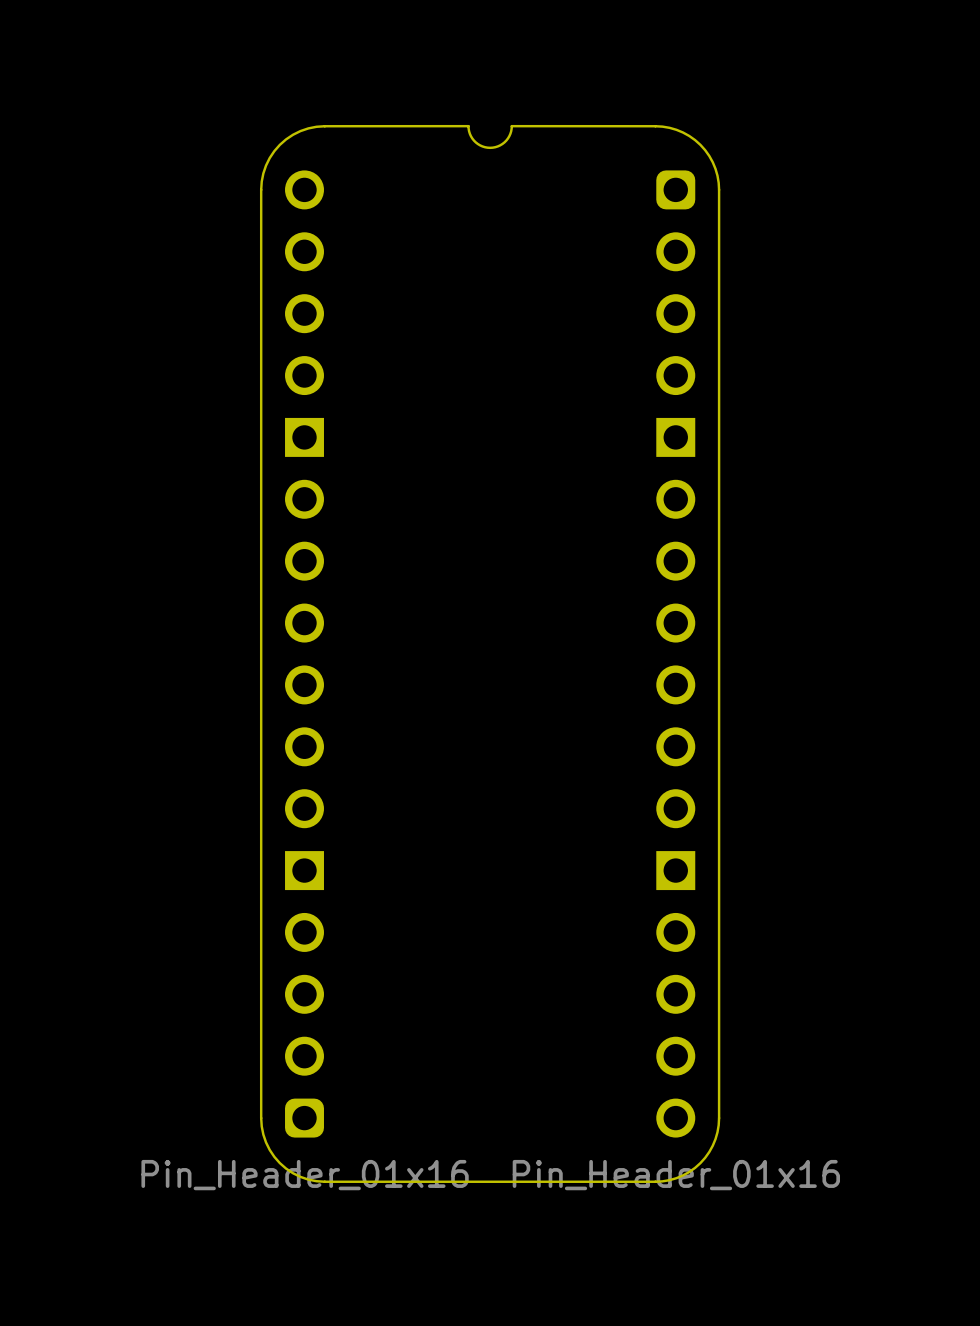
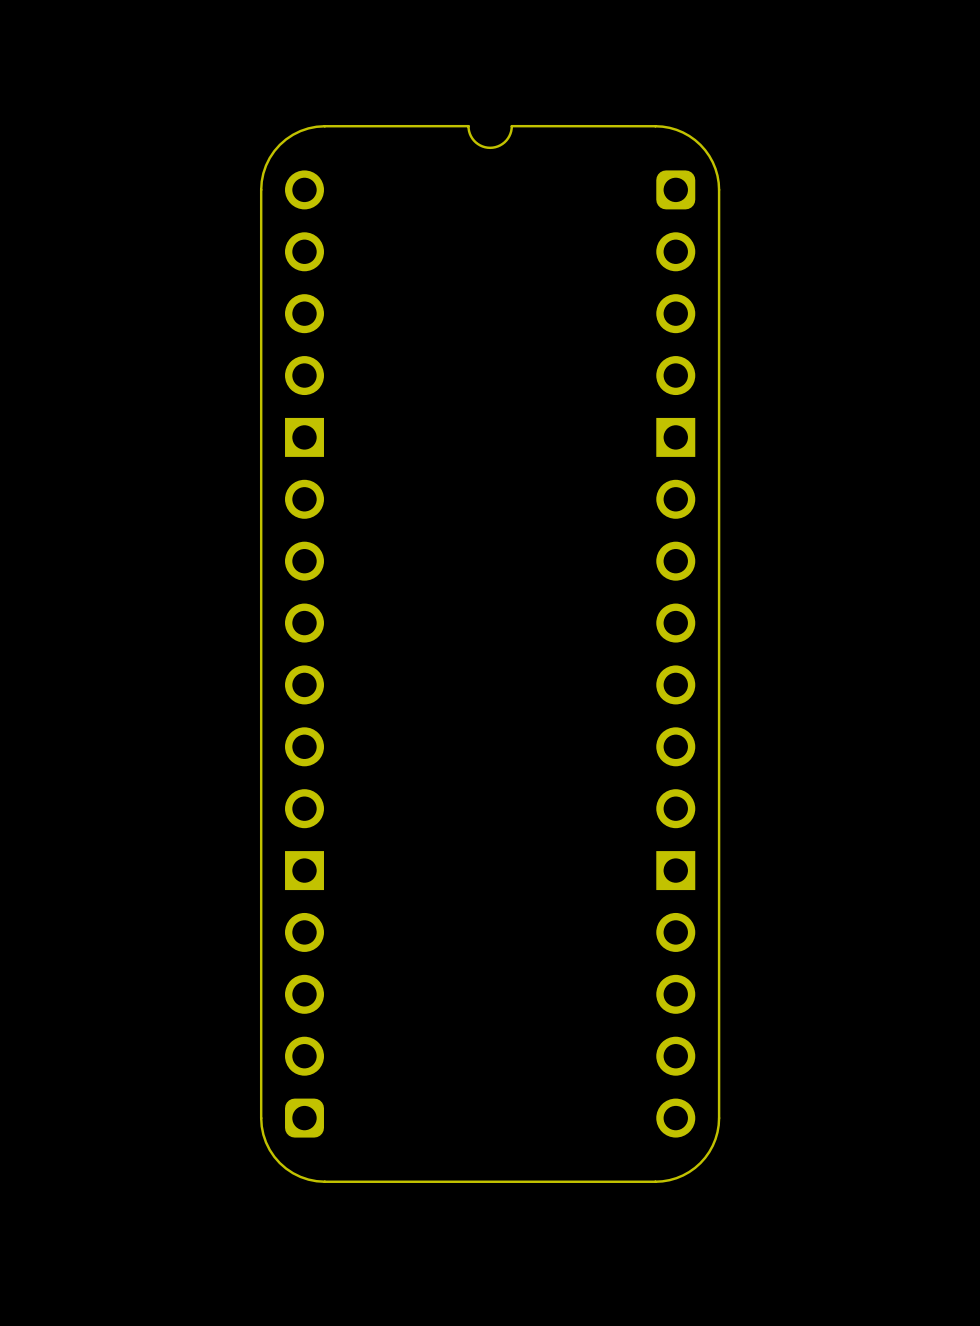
drawing: [141, 1159, 841, 1191] -> none

